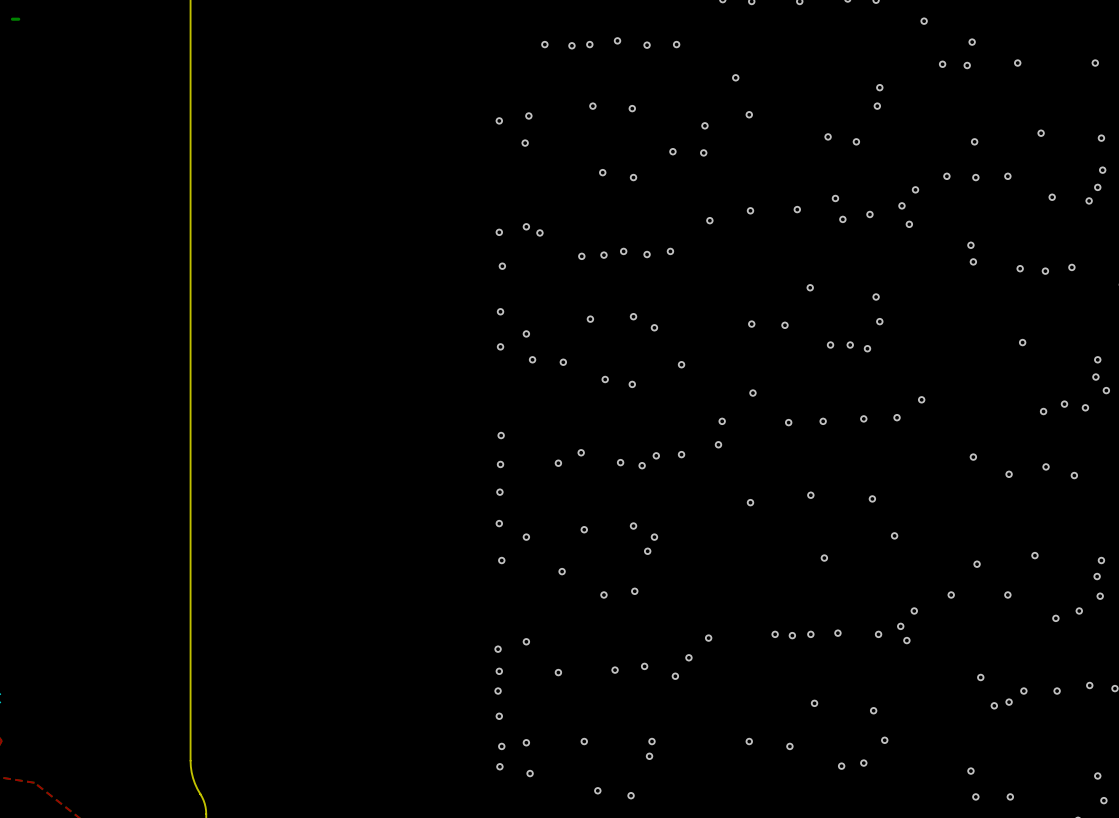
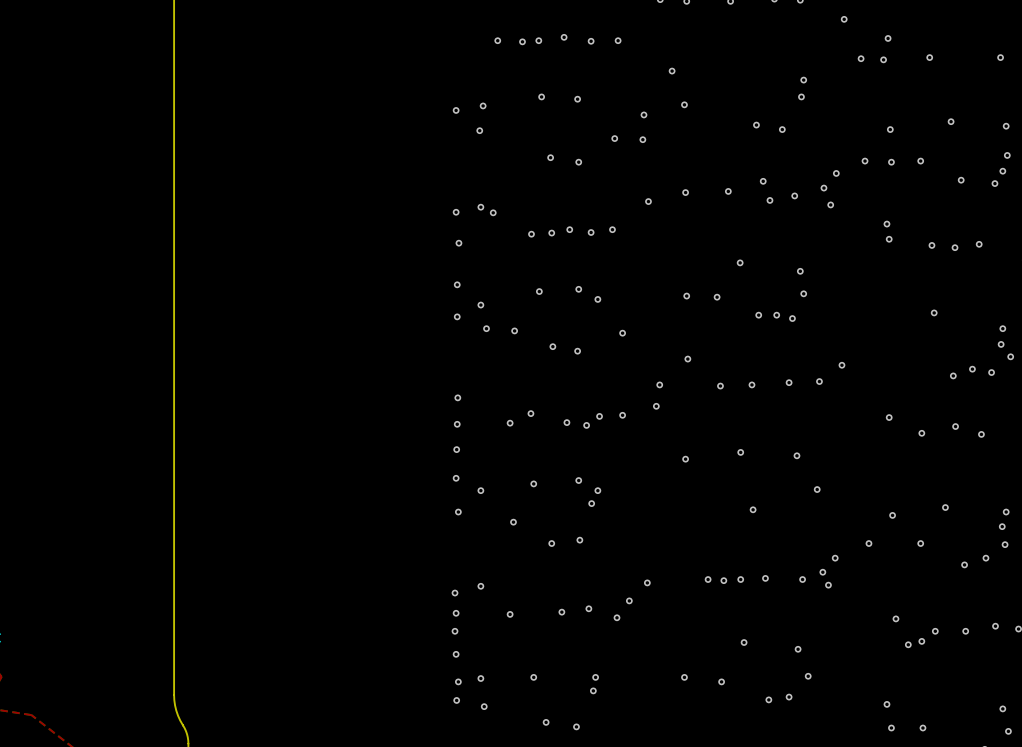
bottom track: (12, 19) (18, 19) -> none

